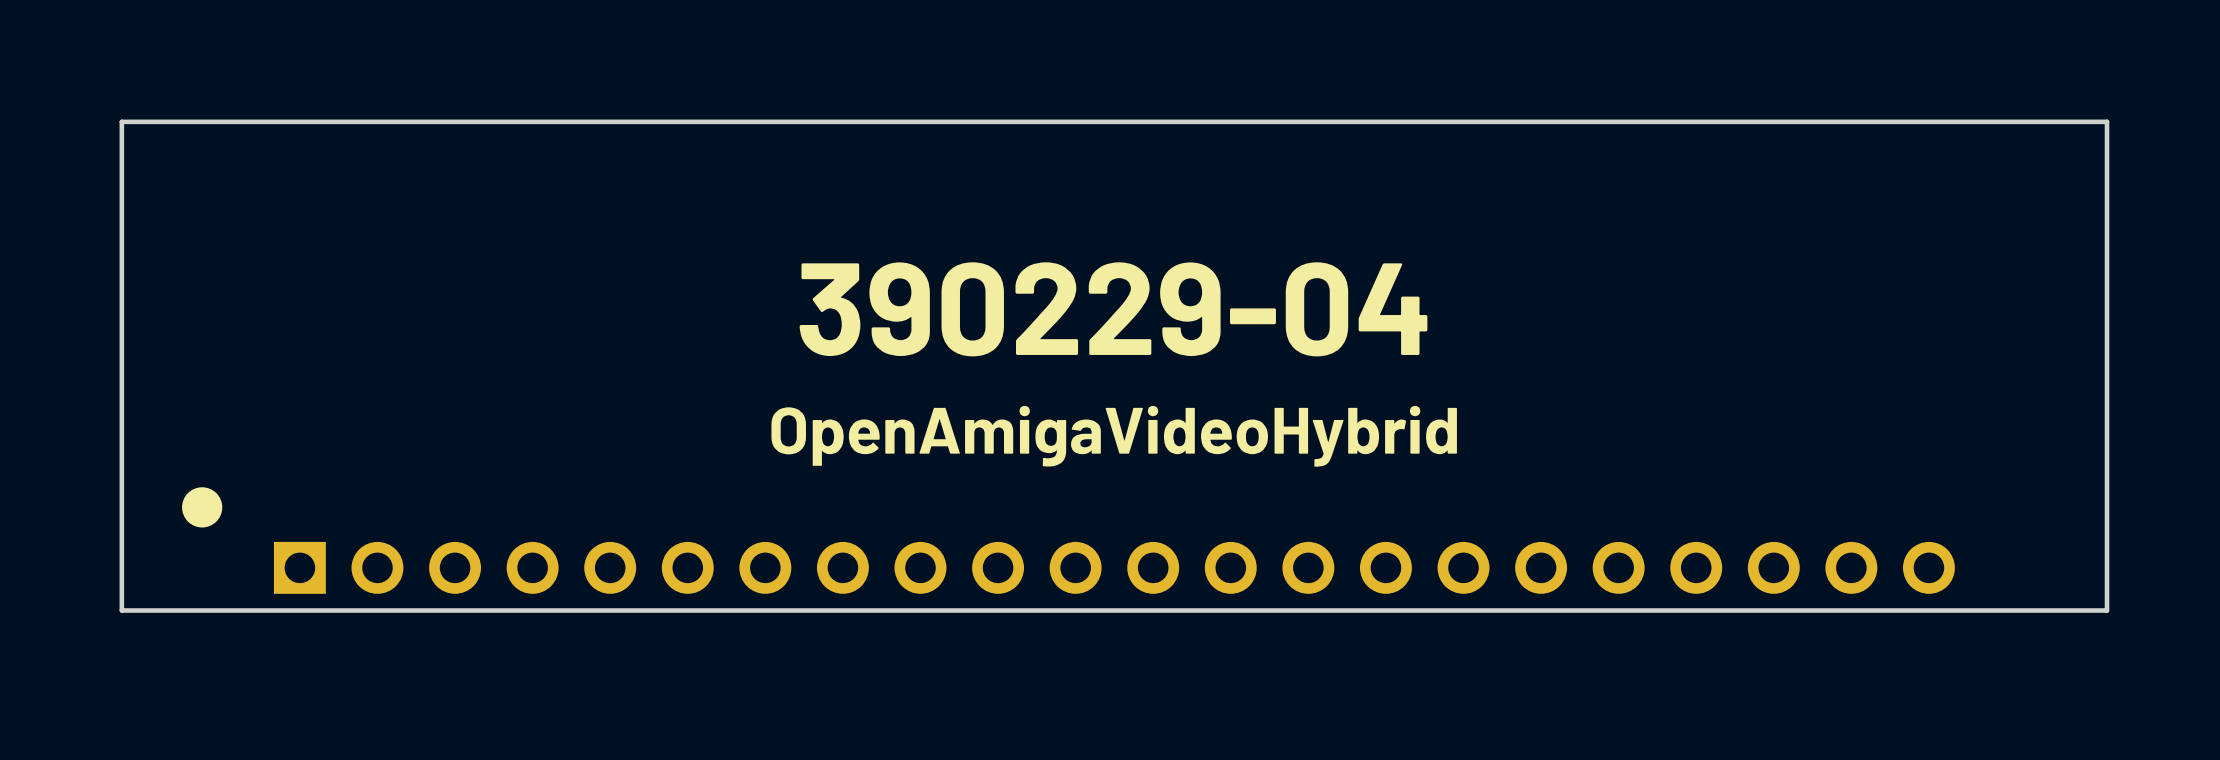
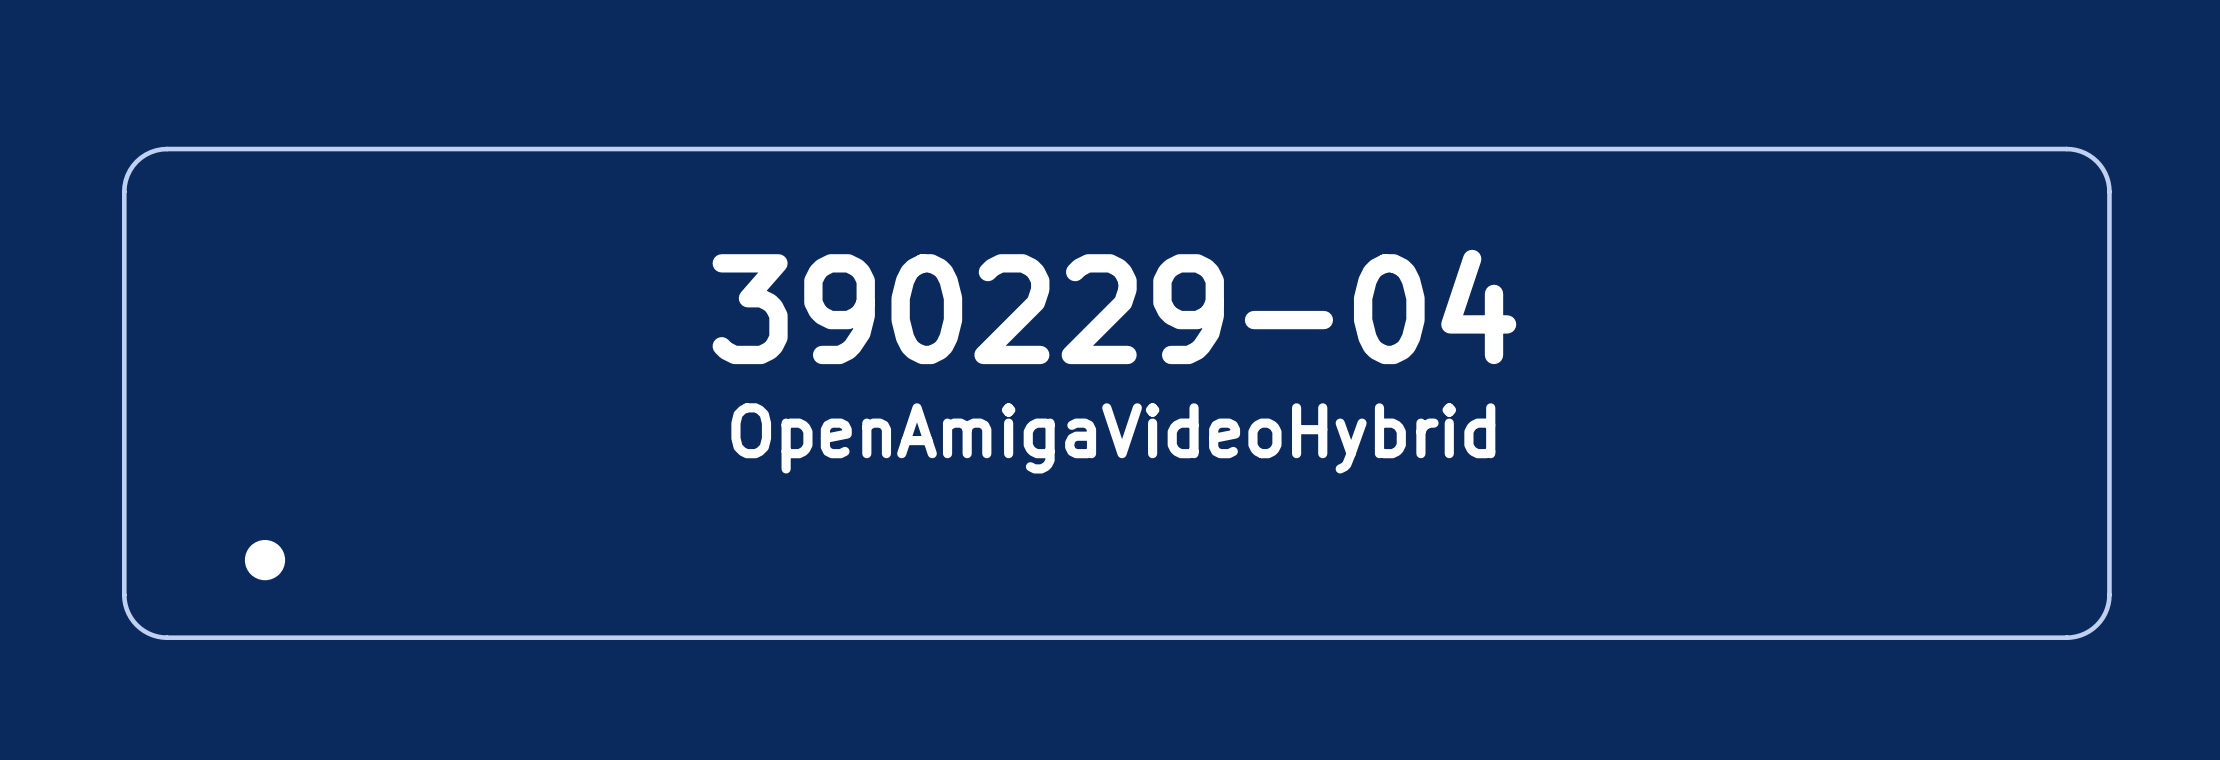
board edge: (2107, 121) (121, 121) (121, 610) (2107, 610) (2107, 121) -> (2066, 149) (155, 150) (145, 154) (133, 165) (124, 186) (125, 604) (130, 617) (140, 628) (152, 635) (167, 637) (2076, 636) (2089, 631) (2100, 621) (2107, 609) (2109, 599) (2109, 191) (2105, 173) (2096, 161) (2080, 151) (2066, 149)
drawing position: (202, 507) -> (264, 560)
part: (1114, 567) -> none

